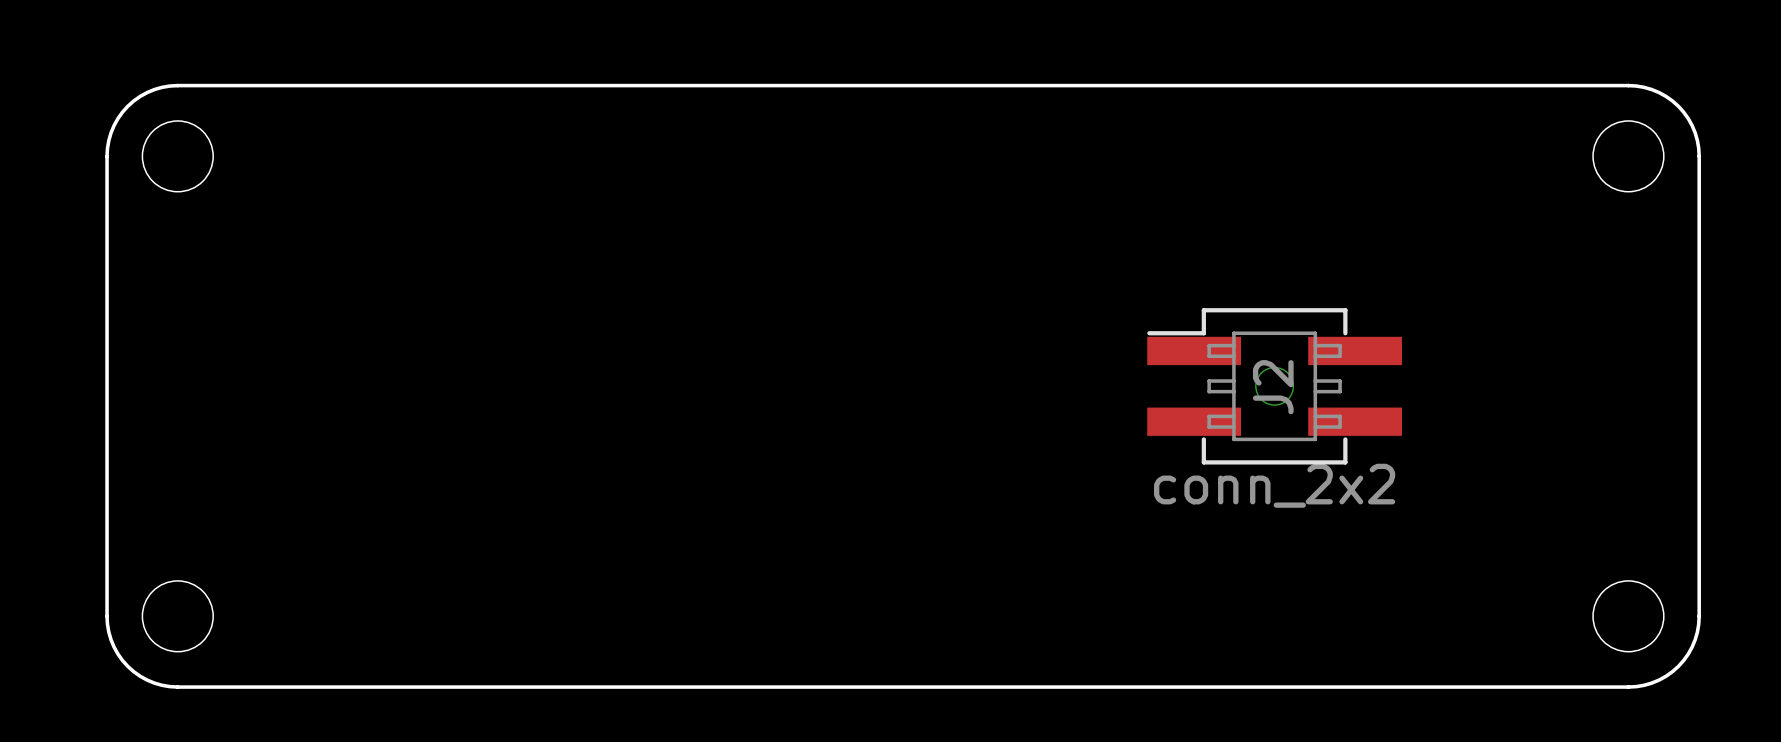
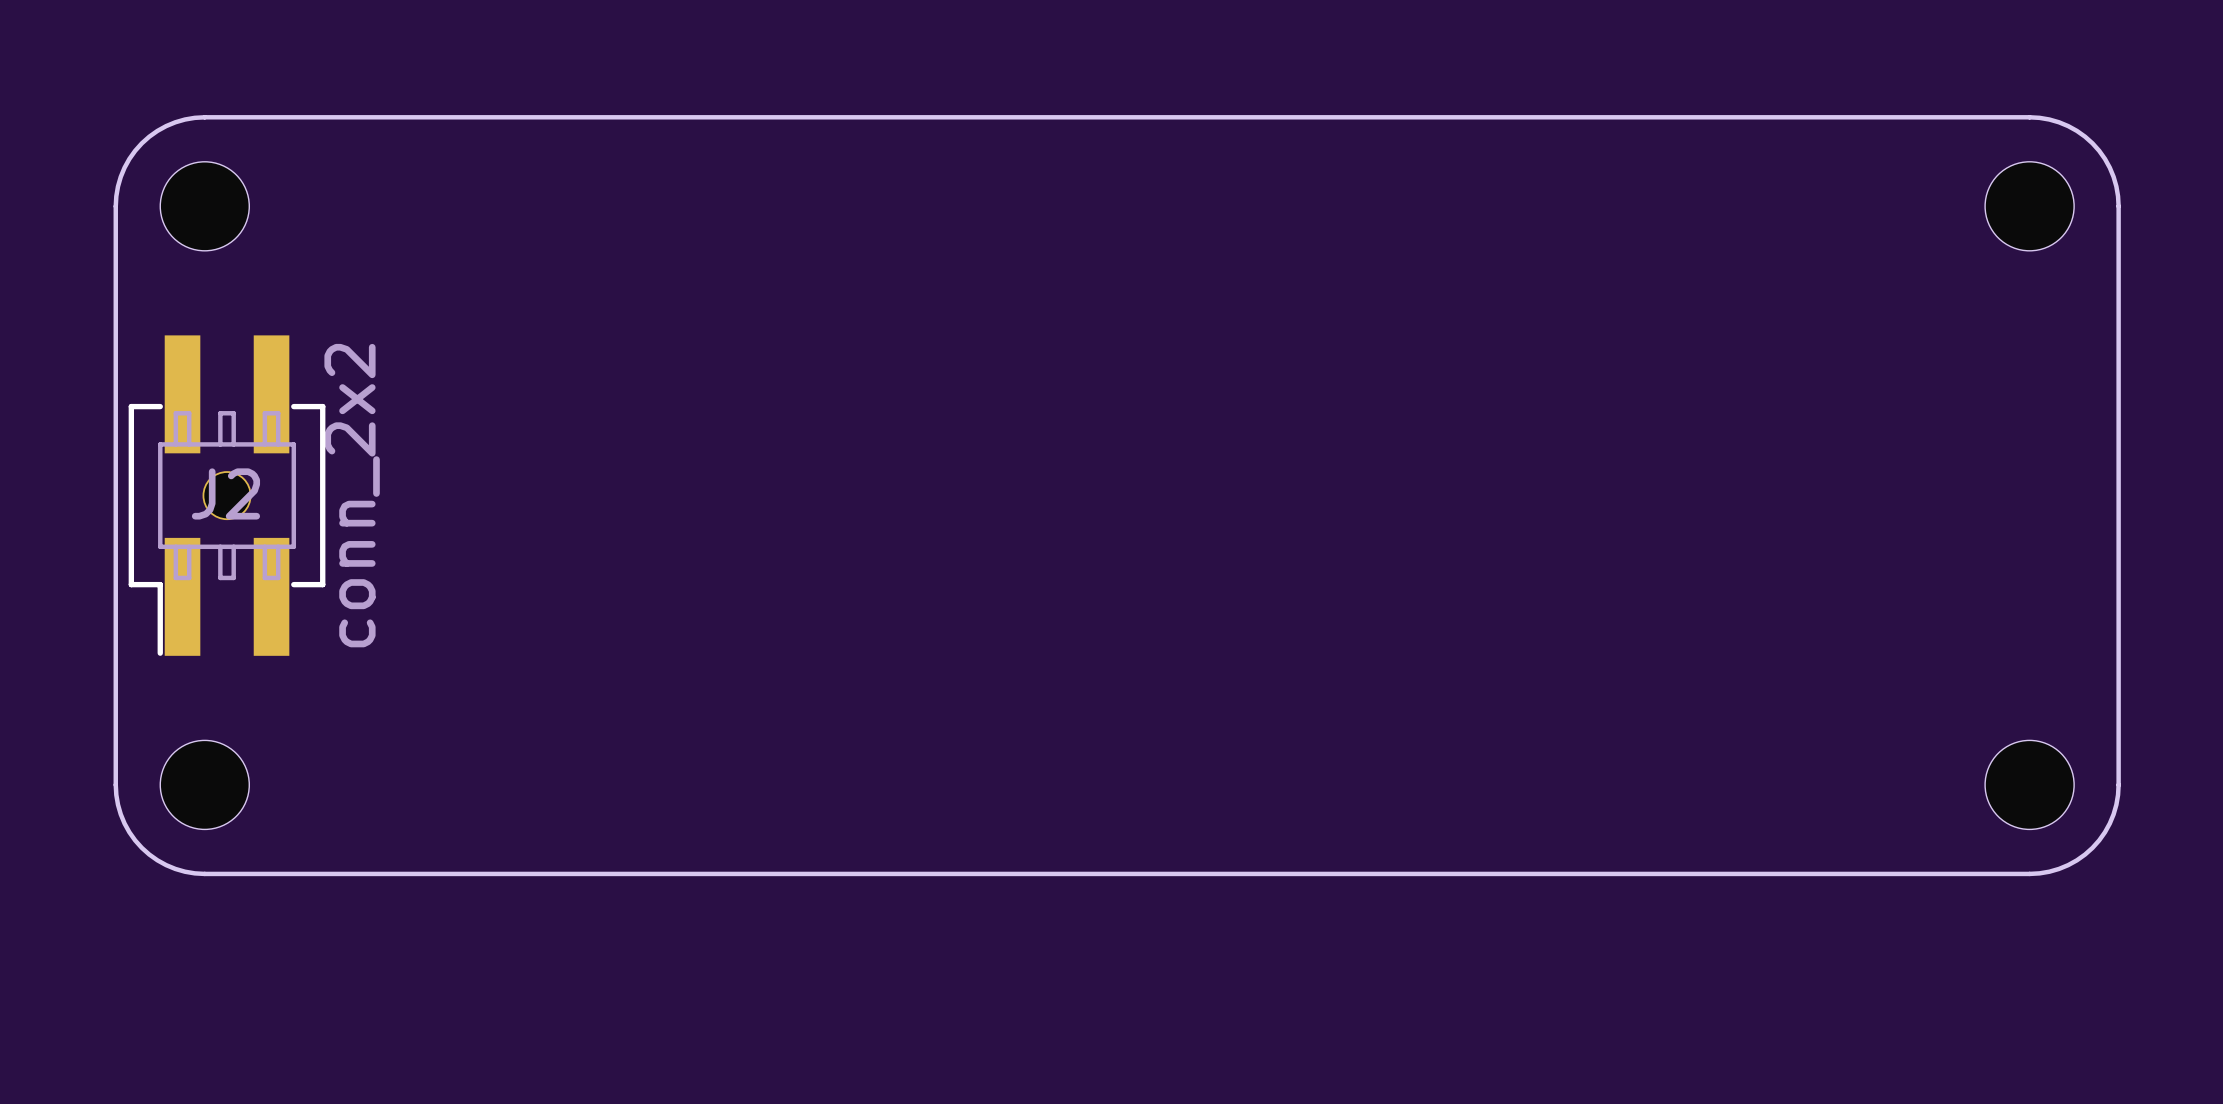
J2 rotation: 0° (1274, 386) -> 90° counterclockwise (227, 495)
J2 position: (1274, 386) -> (227, 495)

